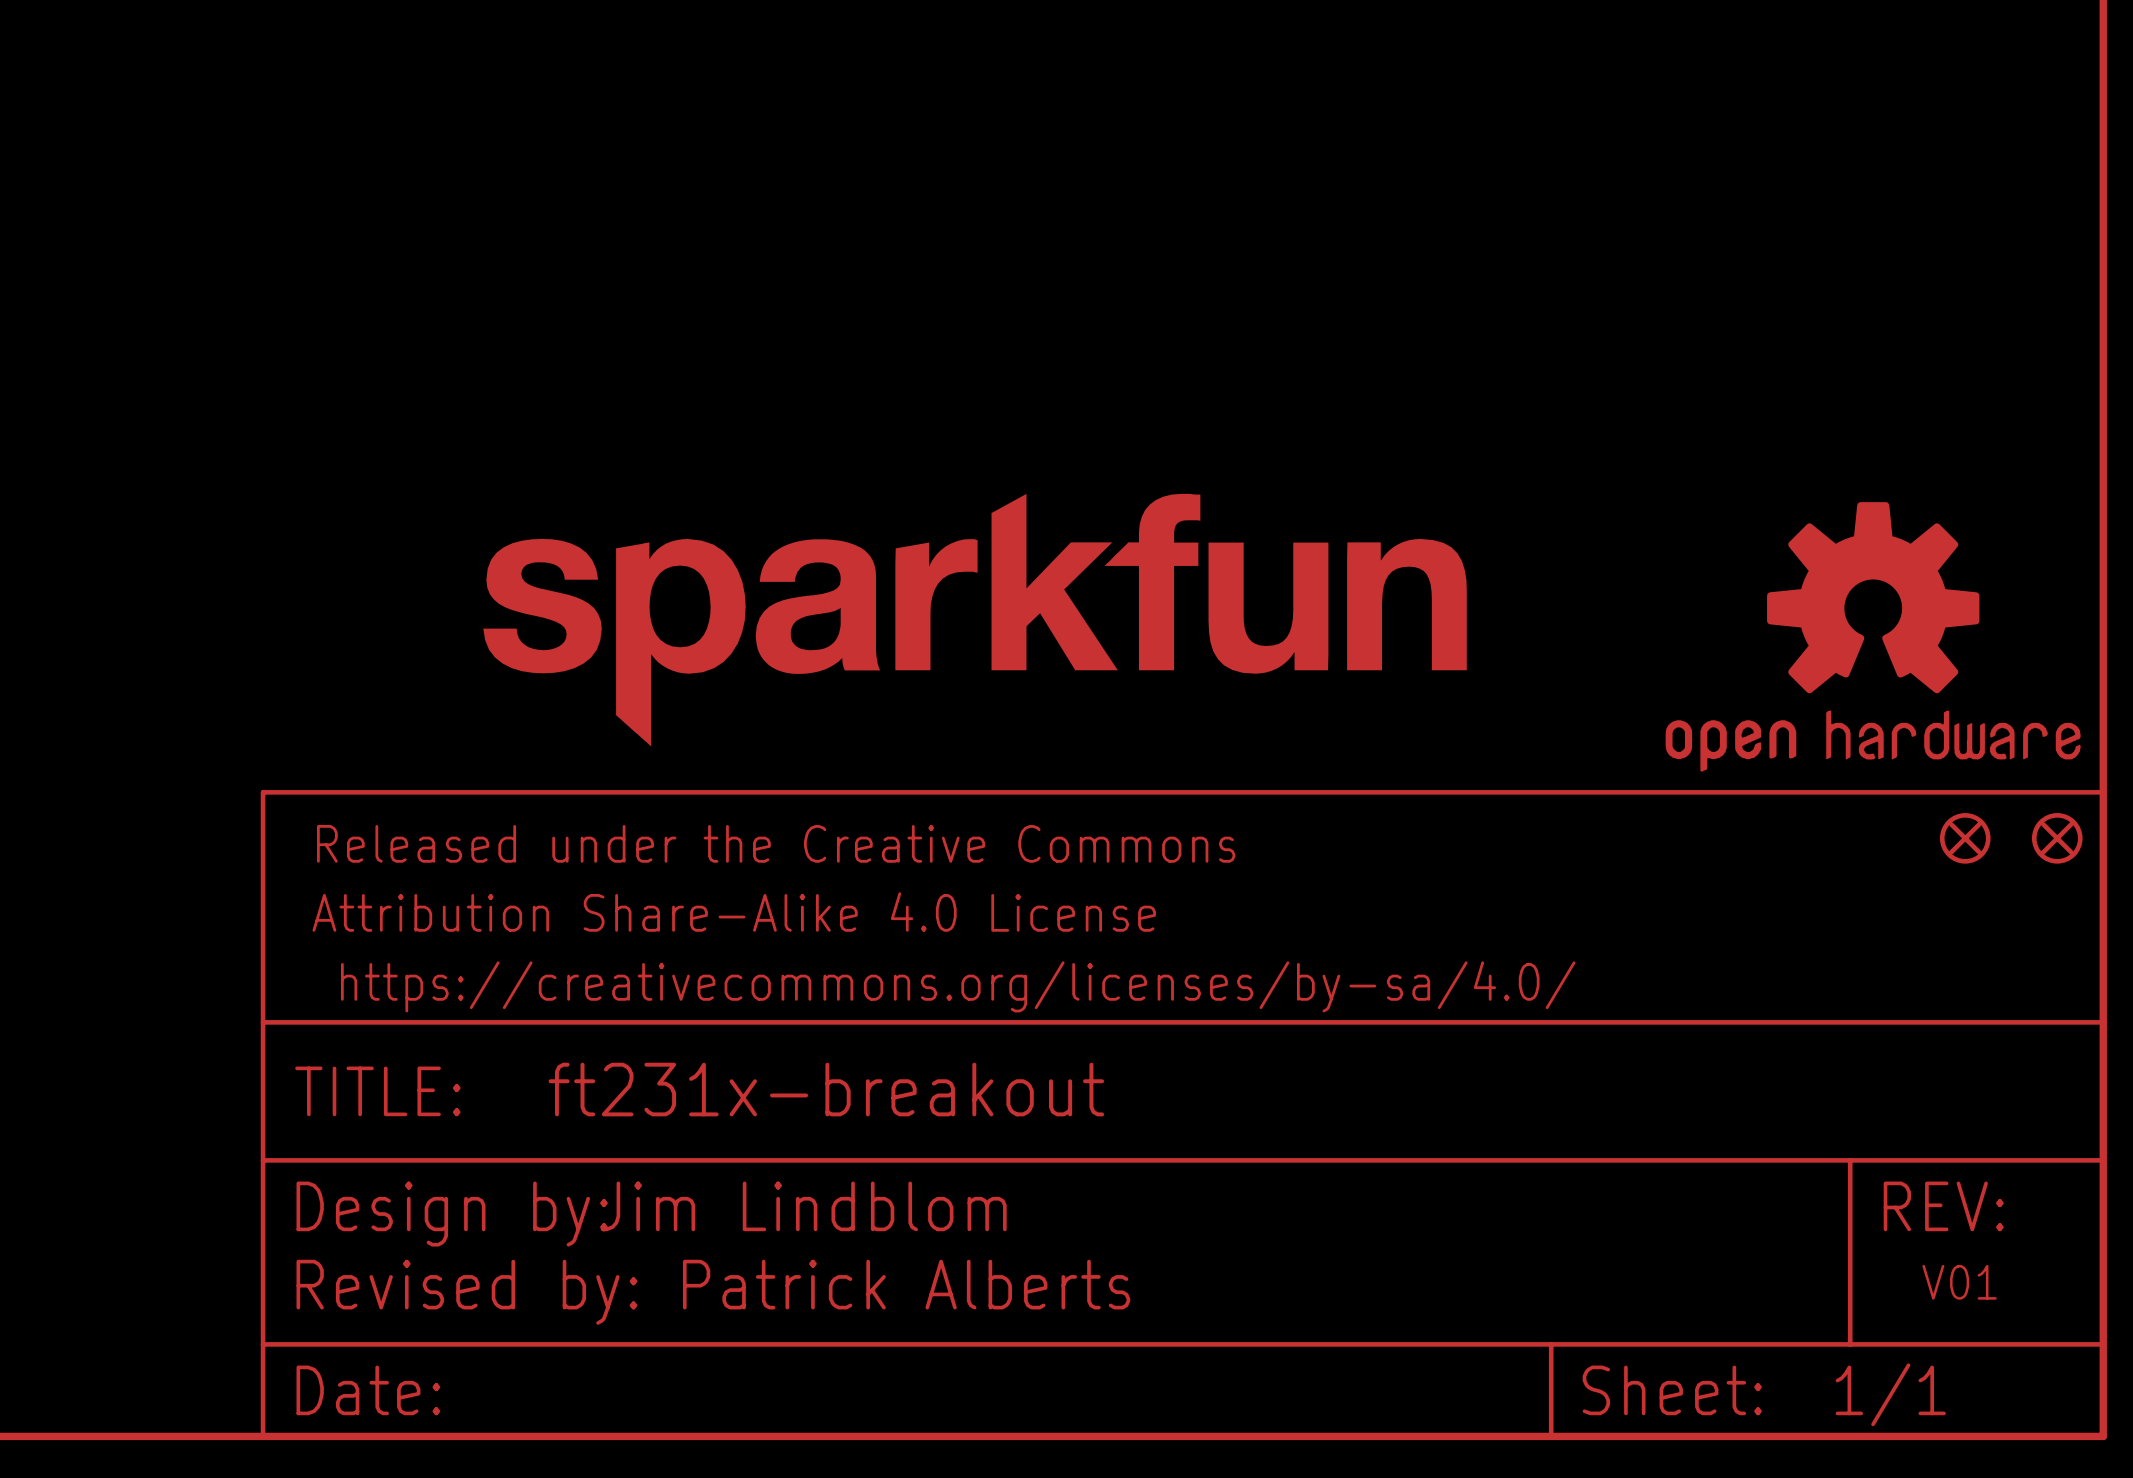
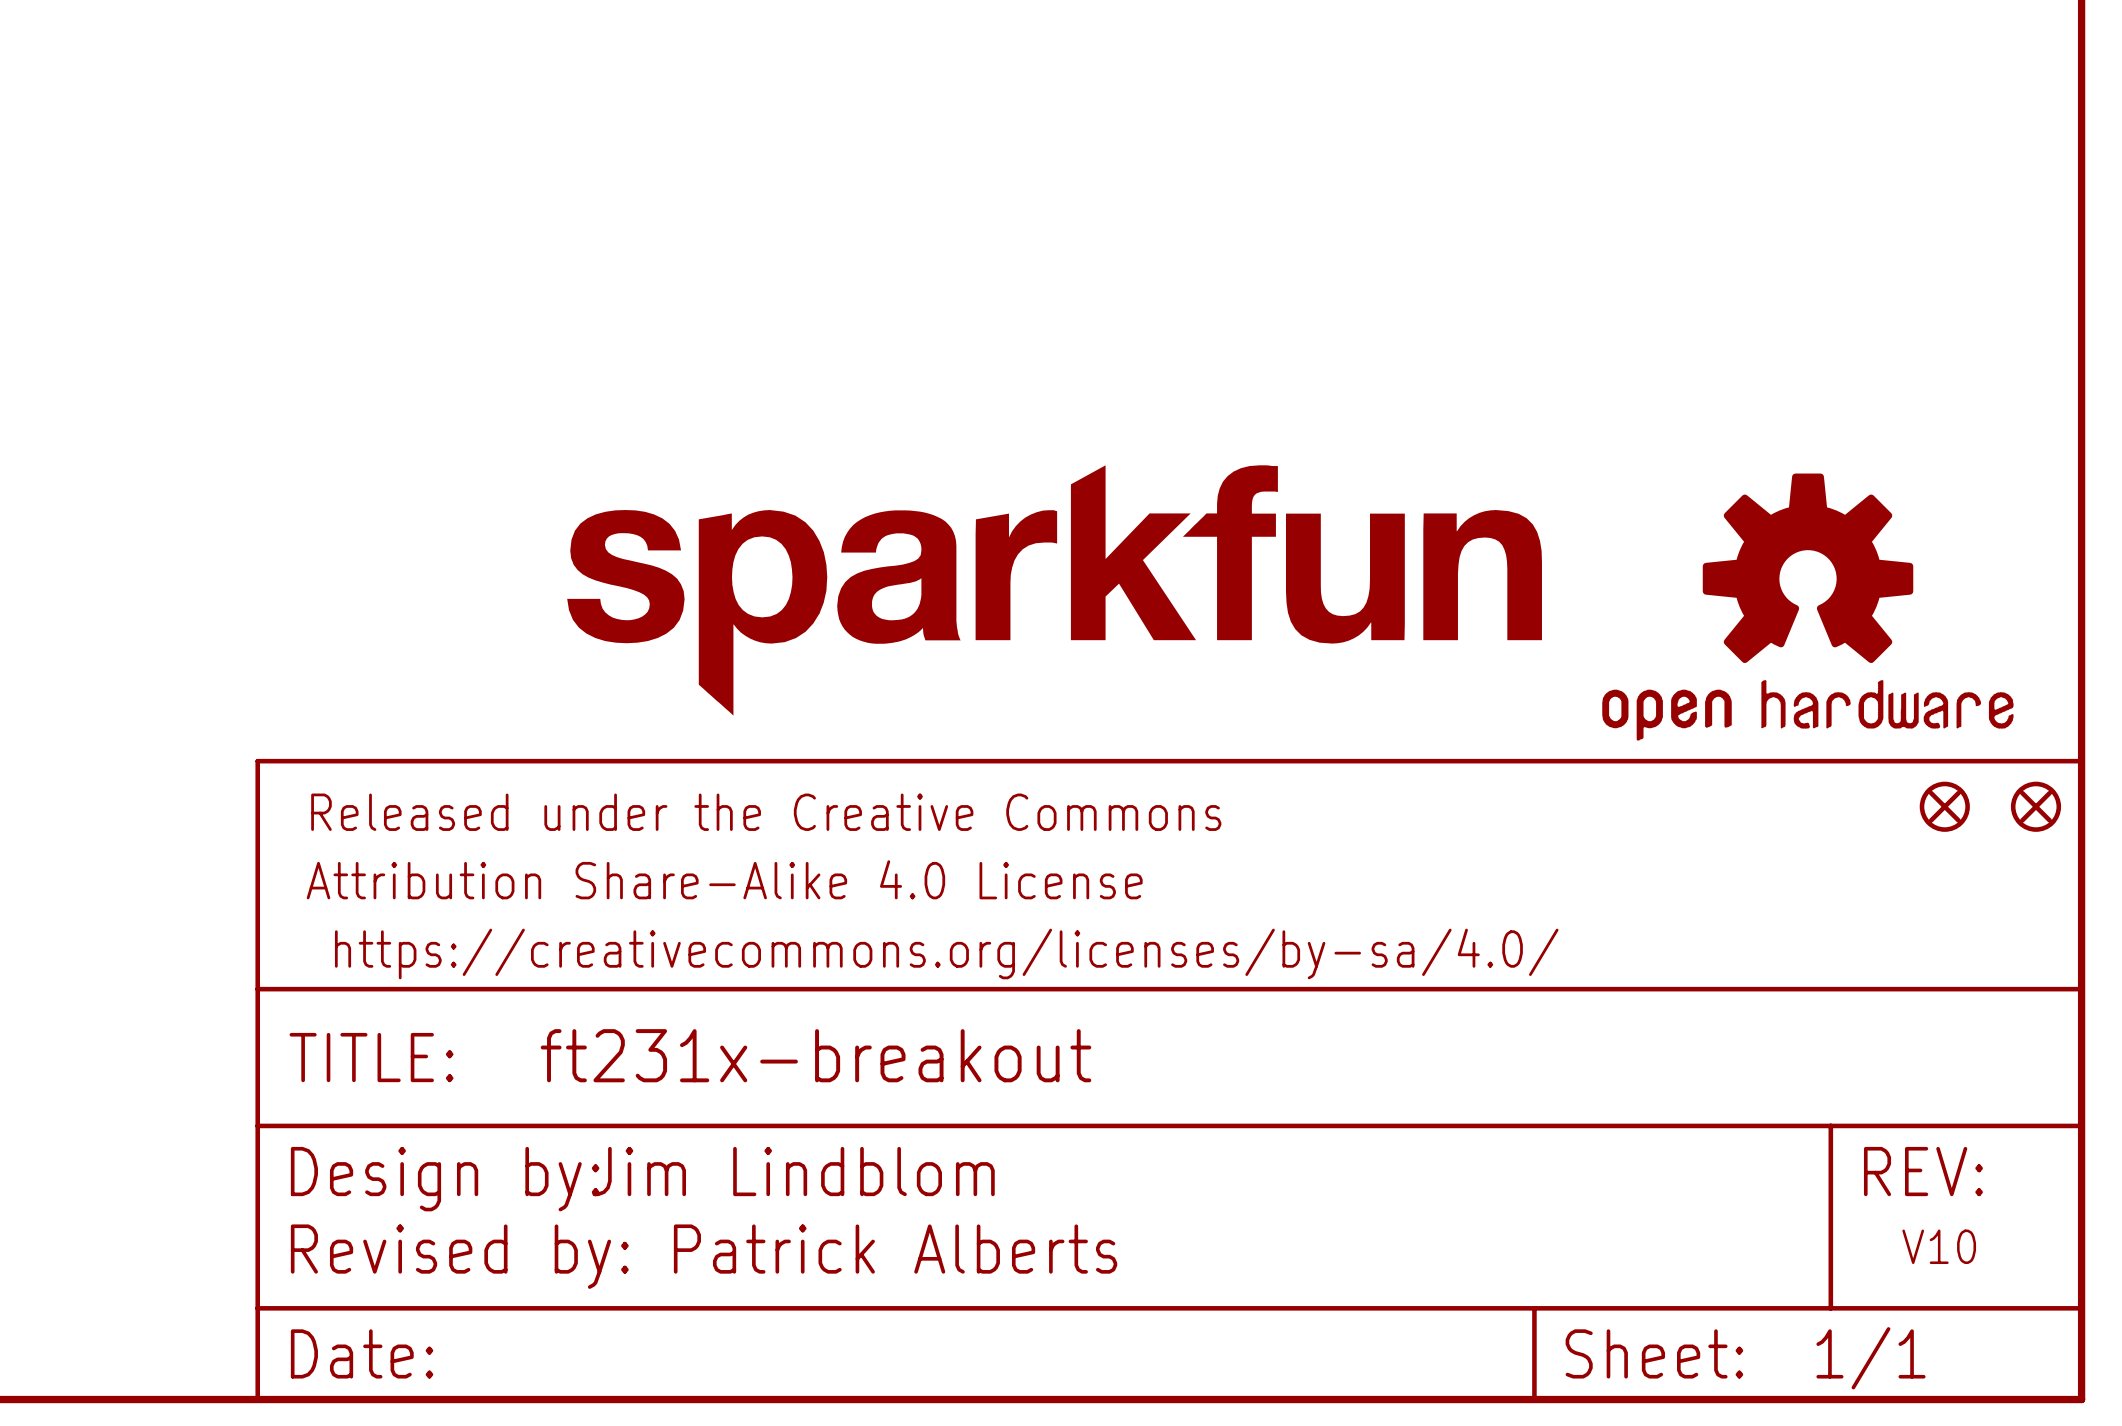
part position: (975, 620) -> (1054, 590)
part position: (1873, 636) -> (1807, 607)
text: V01 (1959, 1282) -> V10 (1939, 1246)

